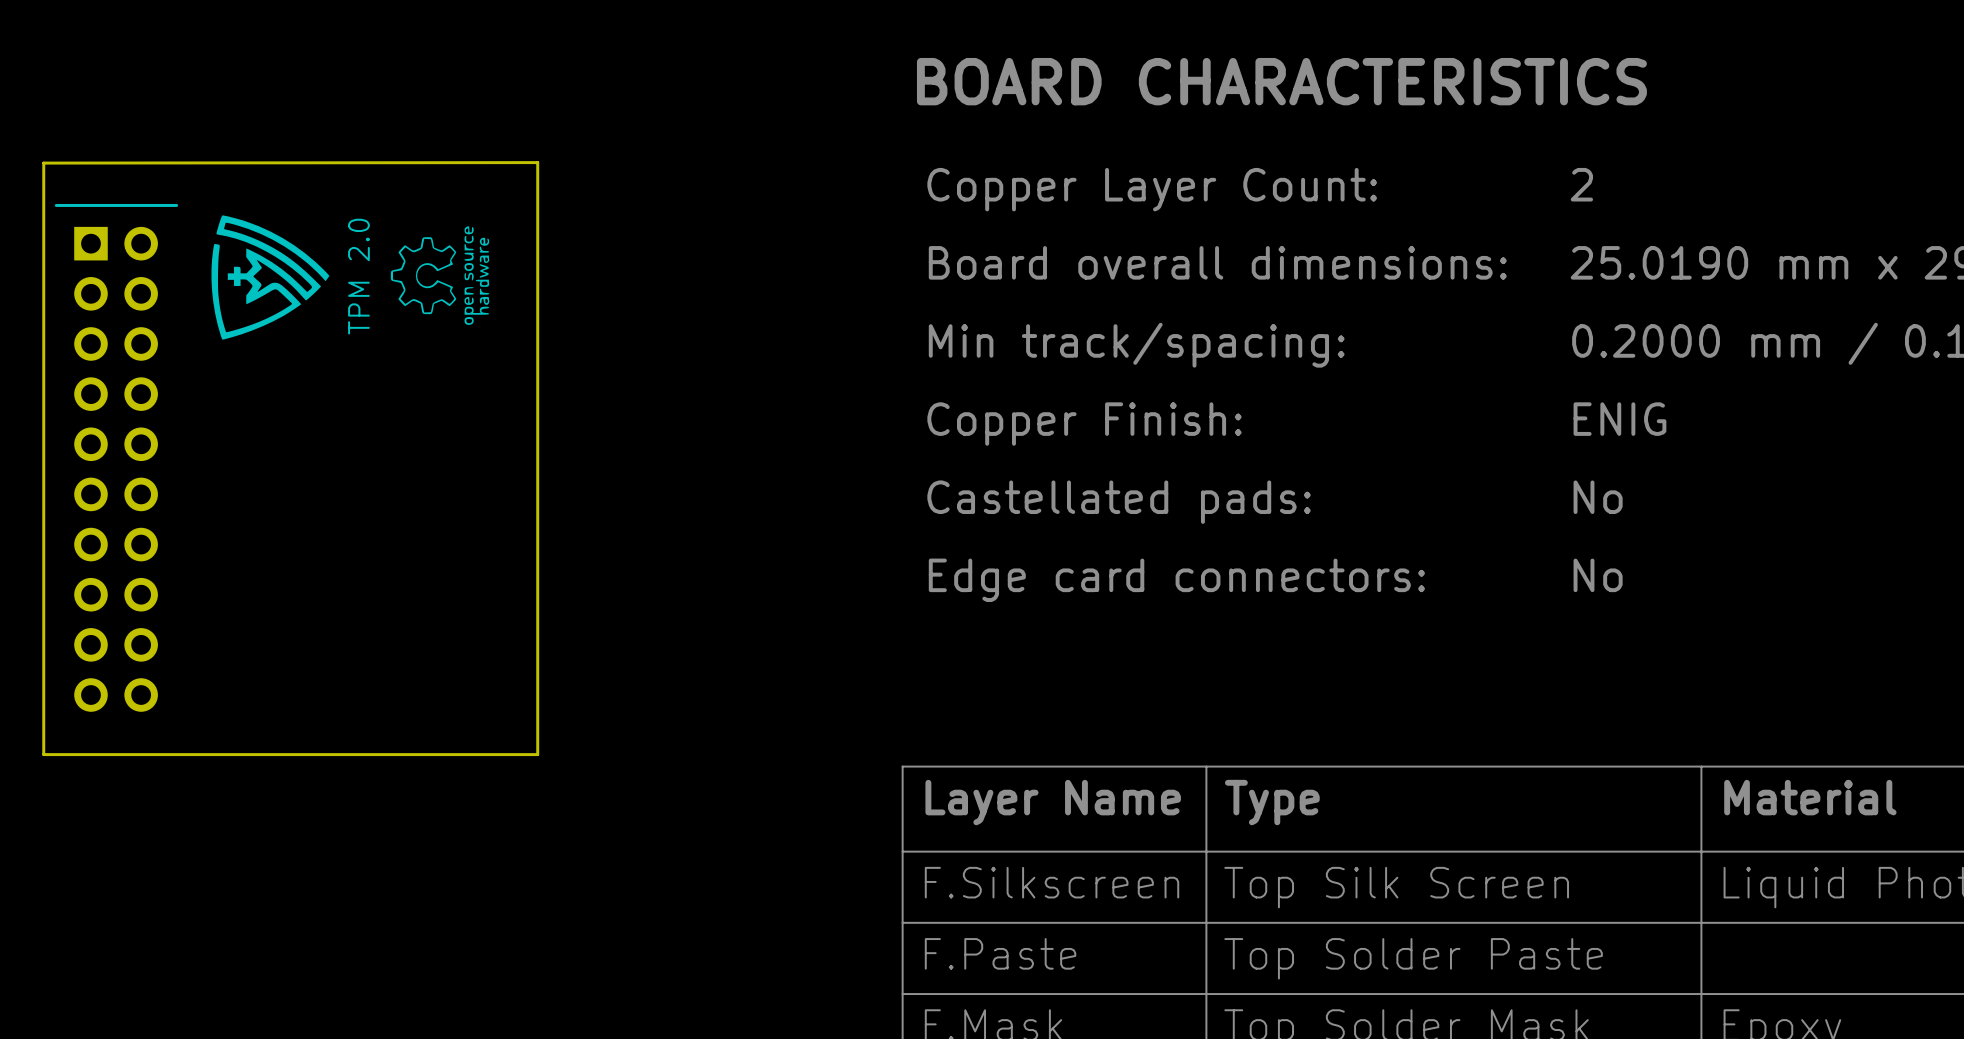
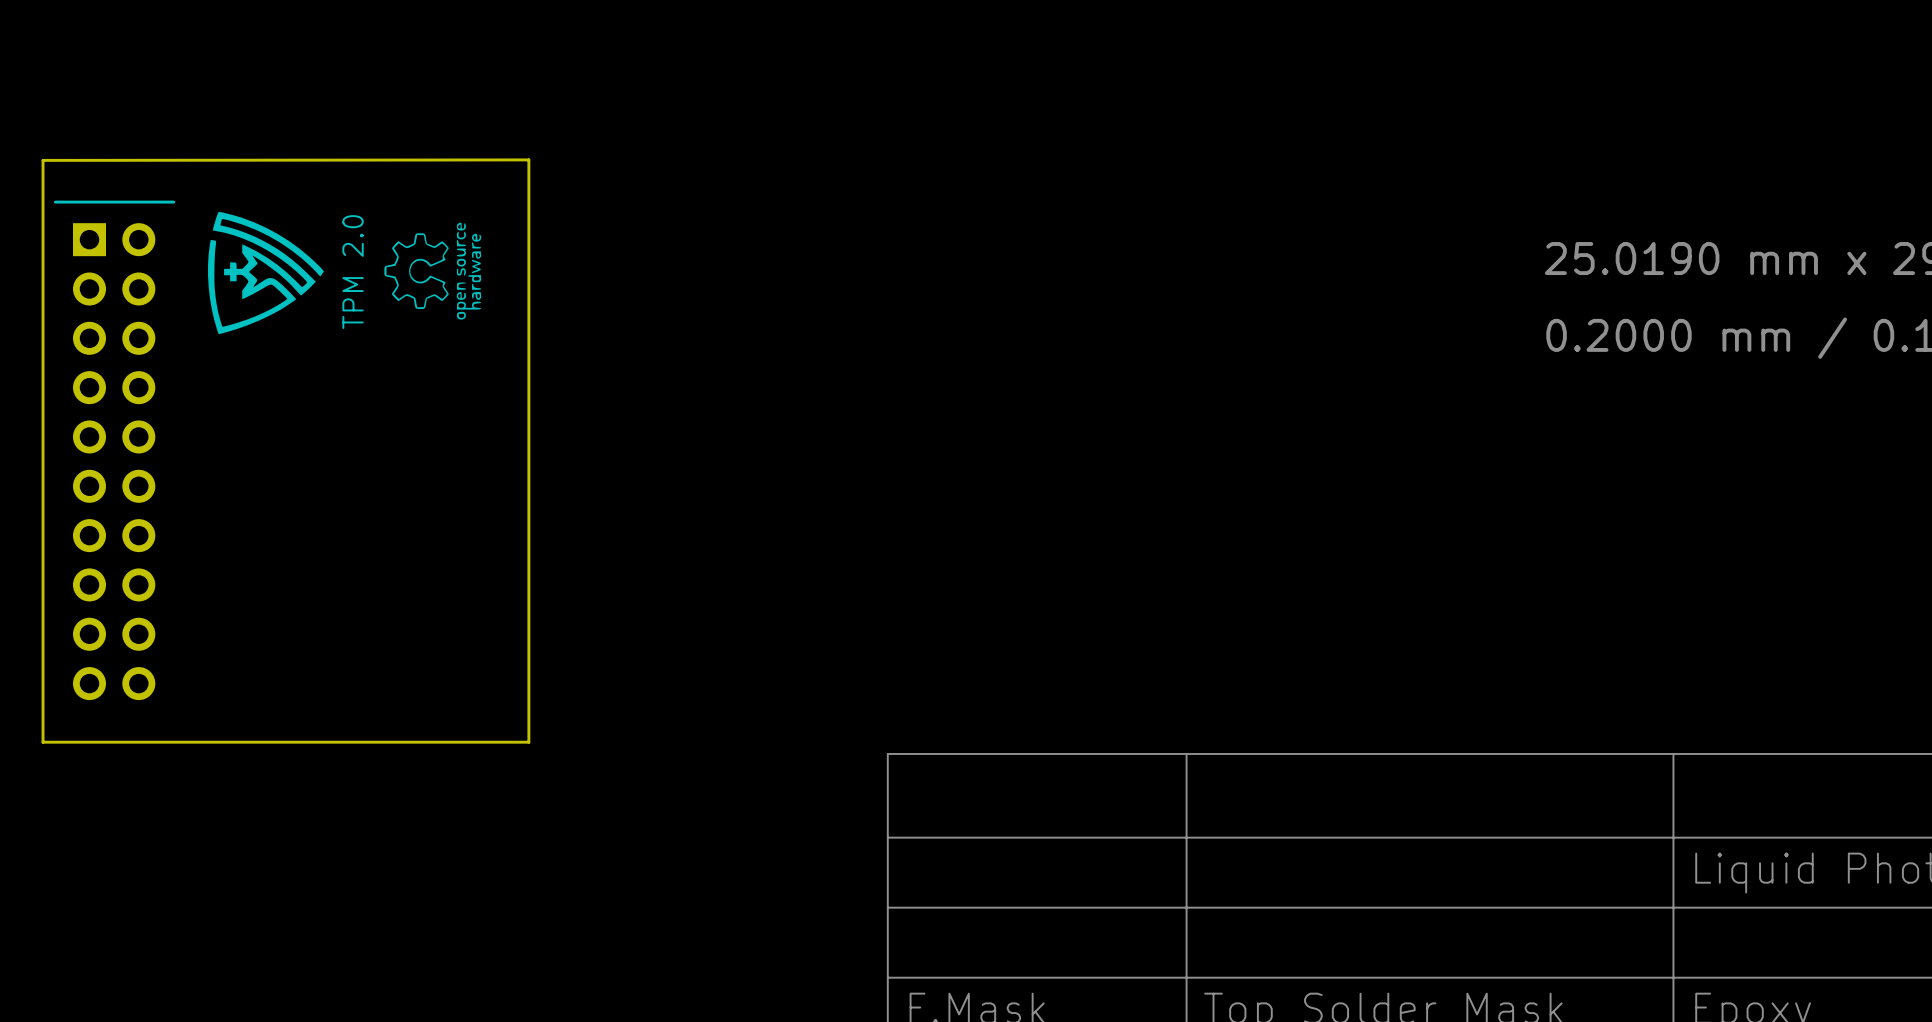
text: BOARD CHARACTERISTICS (1281, 81) -> none
text: 2 (1581, 184) -> none
text: Copper Layer Count: (1152, 189) -> none
text: Board overall dimensions: (1217, 262) -> none
text: Min track/spacing: (1136, 345) -> none
text: ENIG (1619, 419) -> none
text: Copper Finish: (1084, 424) -> none
text: No (1598, 497) -> none
text: Castellated pads: (1119, 502) -> none
text: No (1598, 575) -> none
text: Edge card connectors: (1176, 580) -> none
text: Material (1810, 797) -> none
text: Layer Name (1053, 802) -> none
text: Type (1272, 802) -> none
text: F.Silkscreen (1052, 882) -> none
text: Top Silk Screen (1396, 887) -> none
text: F.Paste (1000, 953) -> none
text: Top Solder Paste (1413, 958) -> none

